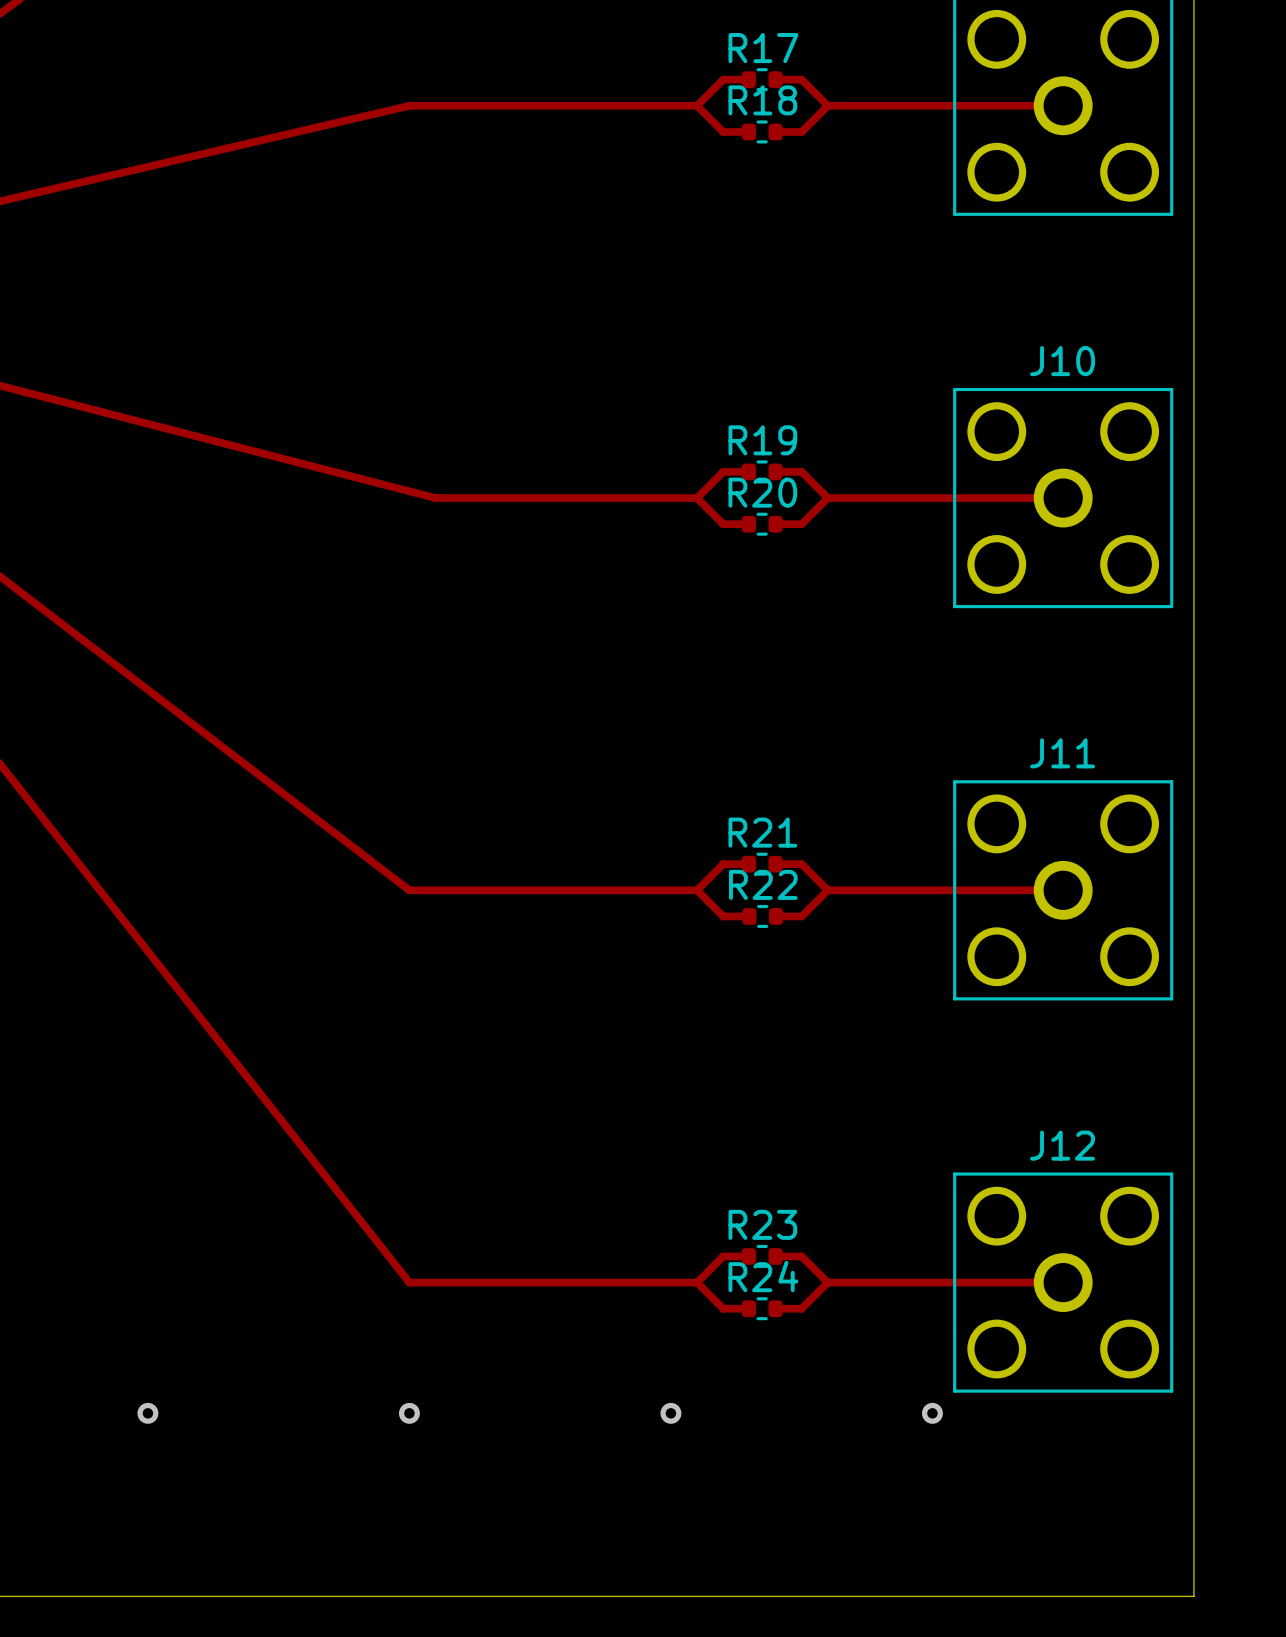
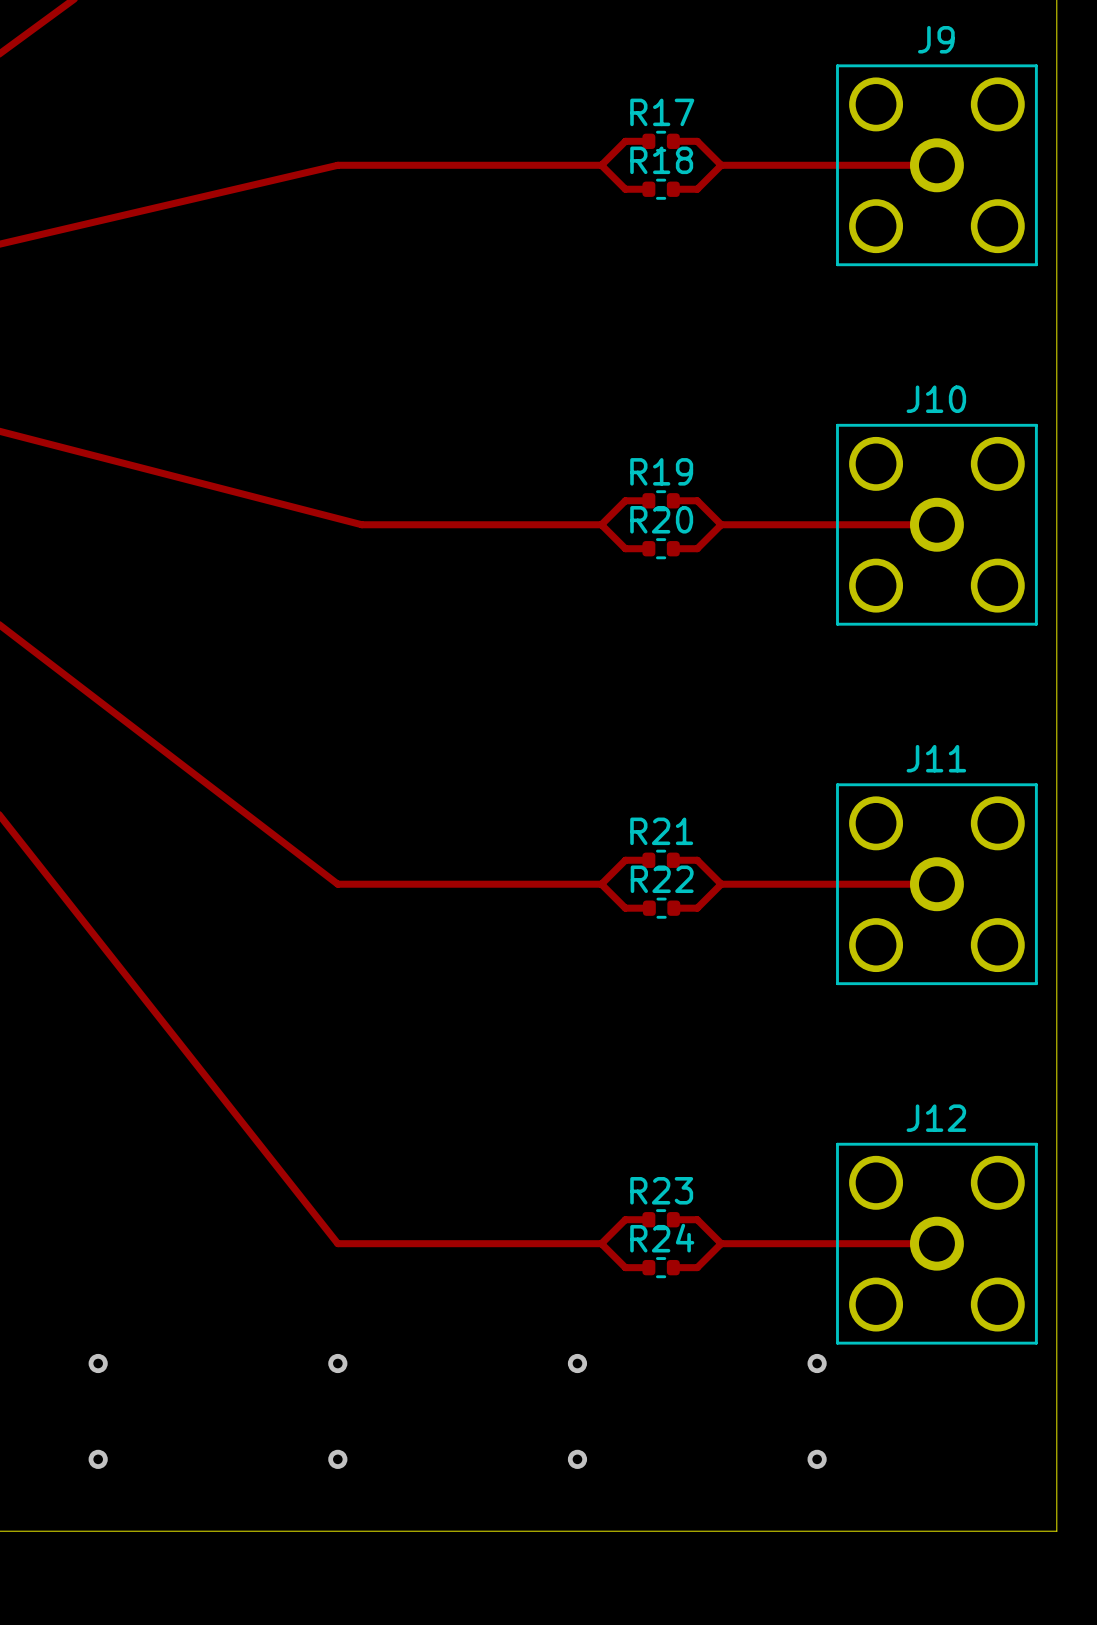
via: none -> (98, 1459)
via: none -> (337, 1459)
via: none -> (577, 1459)
via: none -> (817, 1459)

